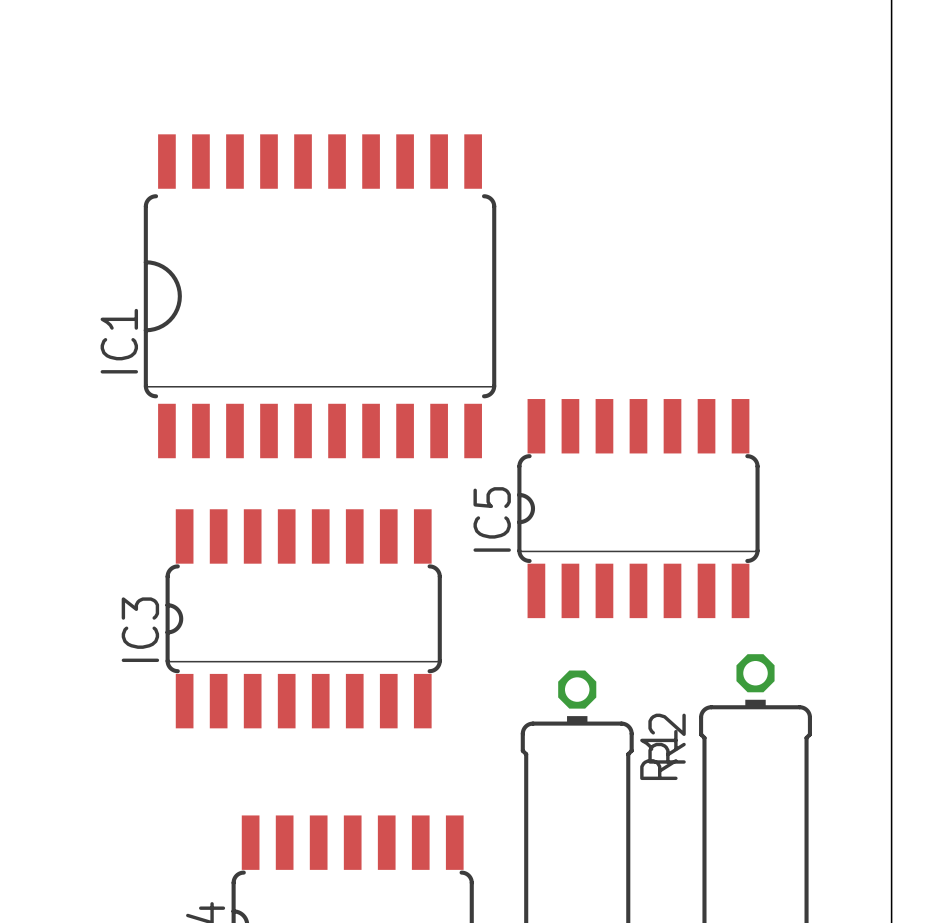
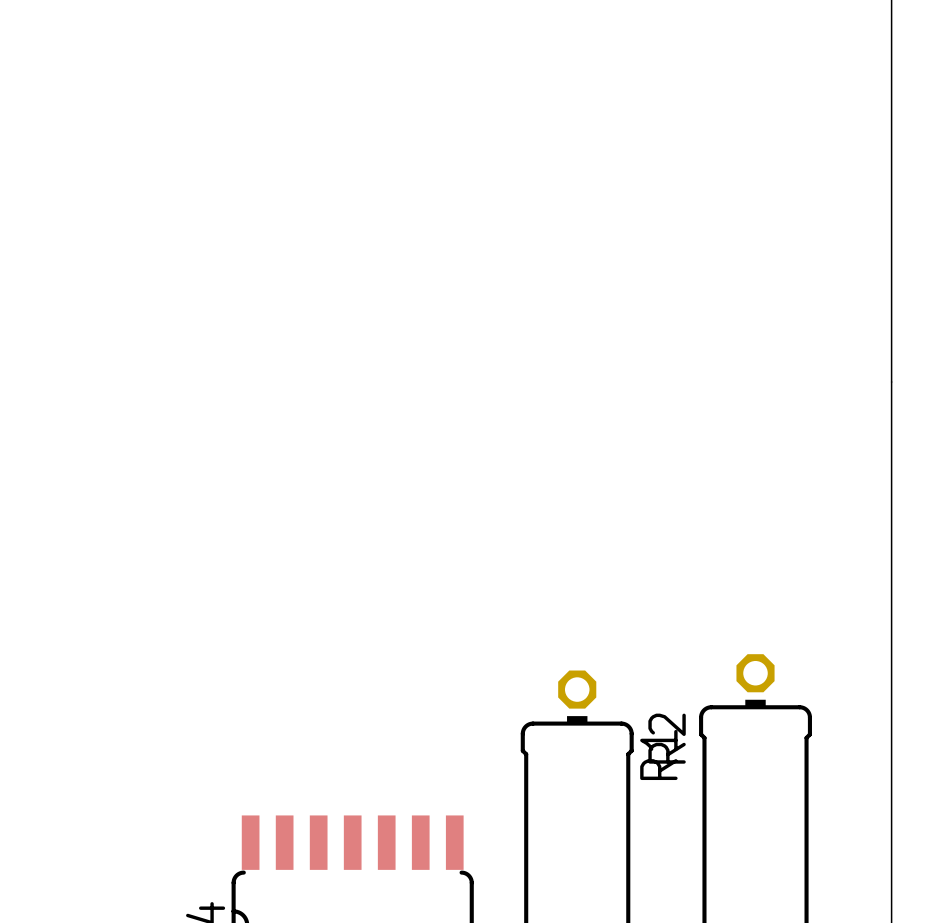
IC1: (320, 296) -> none
IC5: (638, 508) -> none
IC3: (303, 618) -> none

